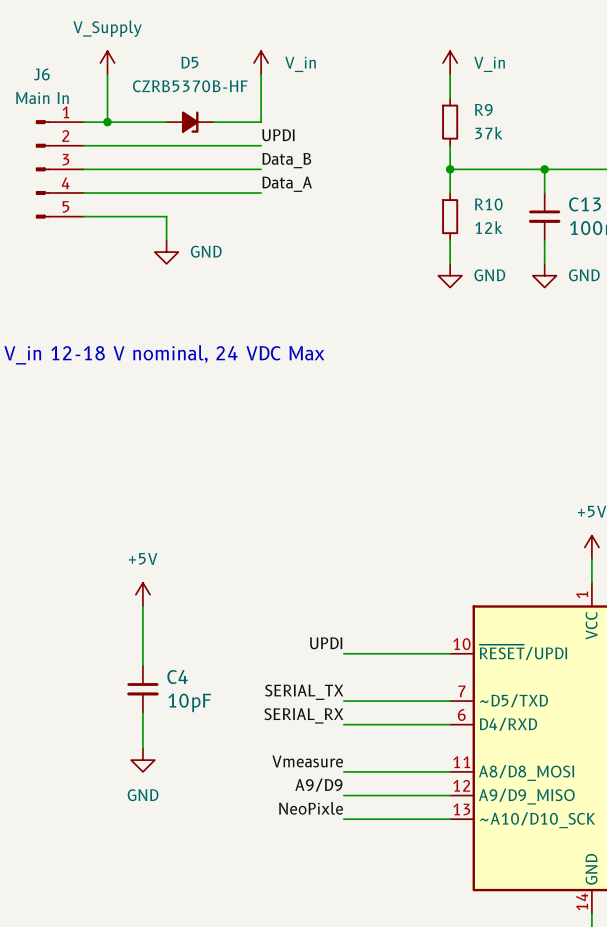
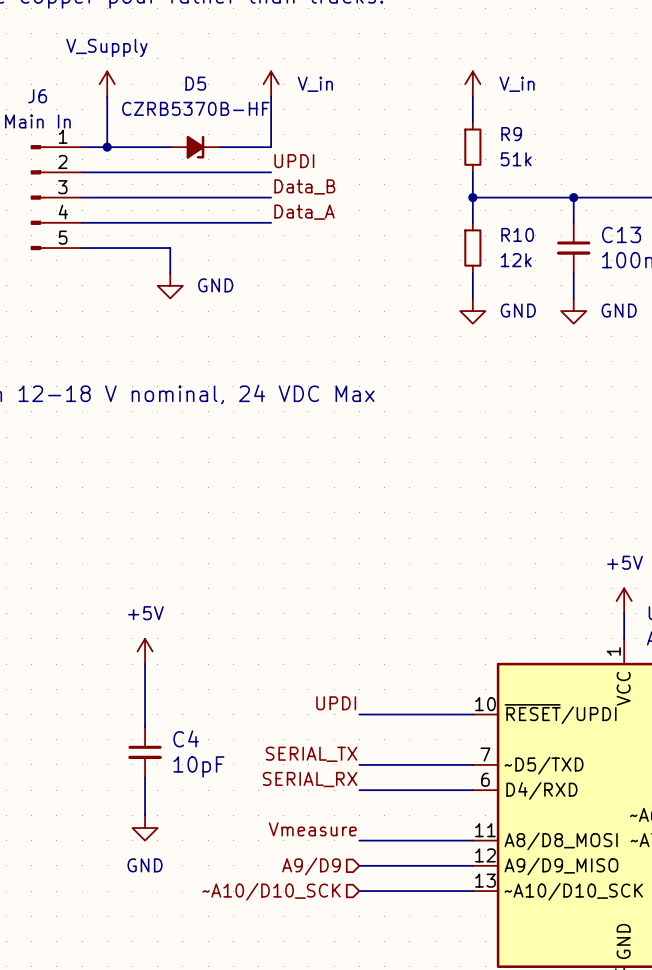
R9 value: 37k (488, 133) -> 51k (516, 159)
label: A9/D9 (318, 785) -> none
hierarchical label: none -> A9/D9 (311, 866)
label: NeoPixle (311, 808) -> none
hierarchical label: none -> ~A10/D10_SCK (271, 891)

